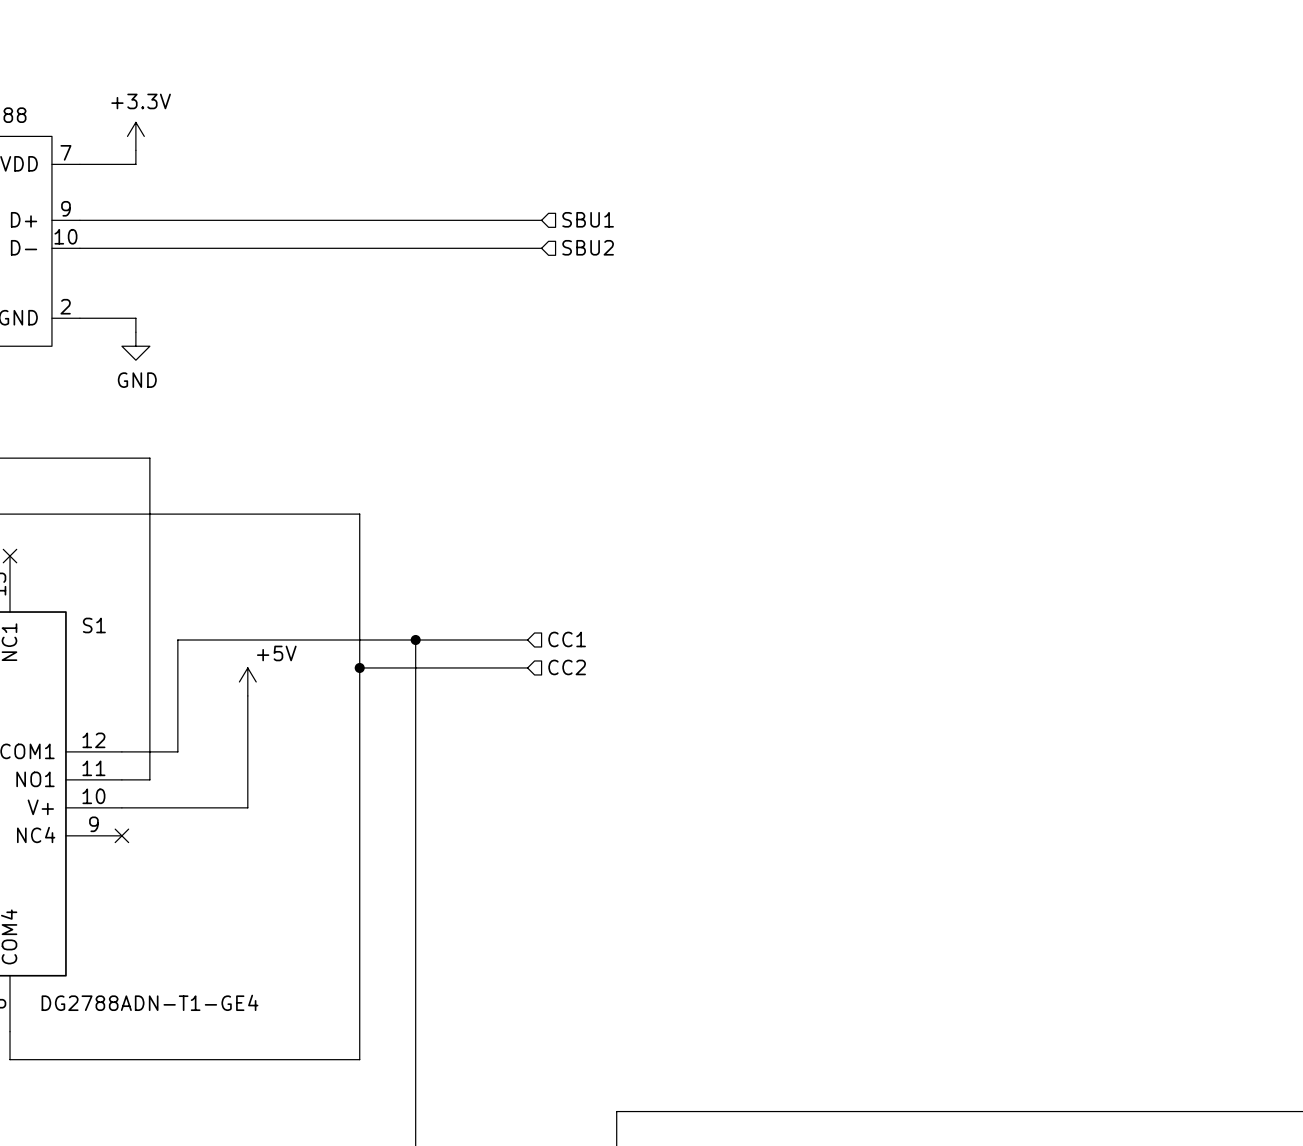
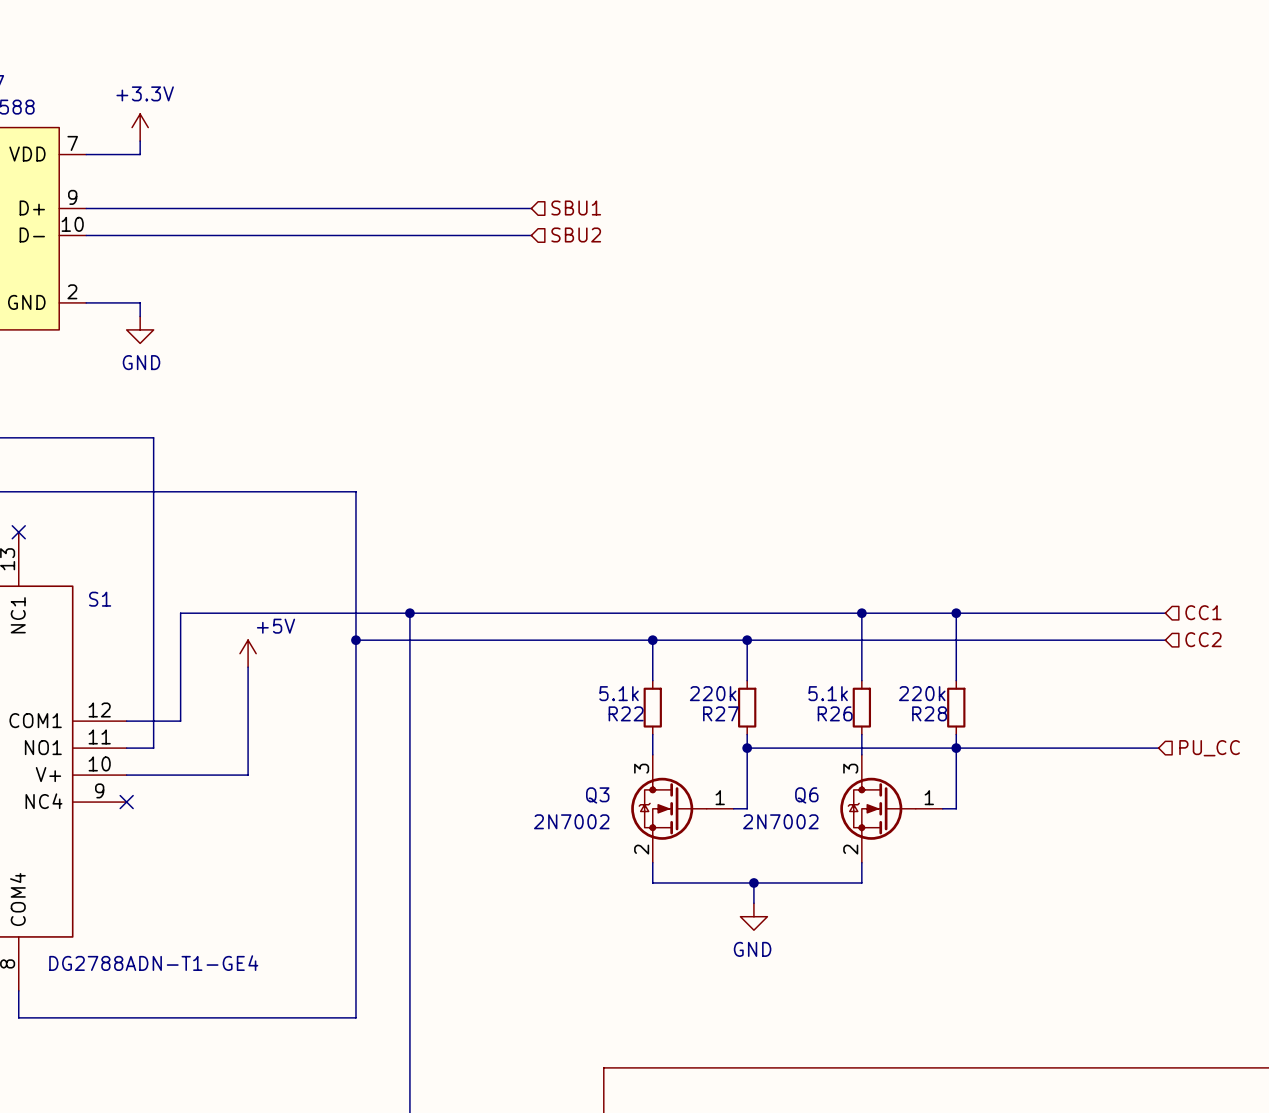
hierarchical label: CC1 (567, 639) -> none
hierarchical label: none -> CC1 (1203, 612)
wire: none -> (517, 613) (1165, 613)
wire: none -> (861, 613) (861, 680)
junction: none -> (861, 613)
wire: none -> (956, 613) (956, 680)
junction: none -> (956, 613)
wire: none -> (517, 640) (1165, 640)
hierarchical label: CC2 (567, 667) -> none
wire: none -> (652, 640) (652, 680)
junction: none -> (652, 640)
wire: none -> (747, 640) (747, 680)
junction: none -> (747, 640)
hierarchical label: none -> CC2 (1203, 639)
R22: none -> 5.1k (652, 707)
R27: none -> 220k (747, 707)
R26: none -> 5.1k (861, 707)
R28: none -> 220k (956, 707)
wire: none -> (652, 734) (652, 754)
wire: none -> (747, 734) (747, 808) (733, 808)
wire: none -> (861, 734) (861, 754)
wire: none -> (956, 734) (956, 808) (942, 808)
wire: none -> (747, 748) (1158, 748)
junction: none -> (747, 748)
junction: none -> (956, 748)
hierarchical label: none -> PU_CC (1209, 748)
Q3: none -> 2N7002 (682, 808)
Q6: none -> 2N7002 (891, 808)
wire: none -> (652, 862) (652, 882) (861, 882) (861, 862)
wire: none -> (753, 882) (753, 903)
junction: none -> (753, 882)
power symbol: none -> GND (753, 916)

